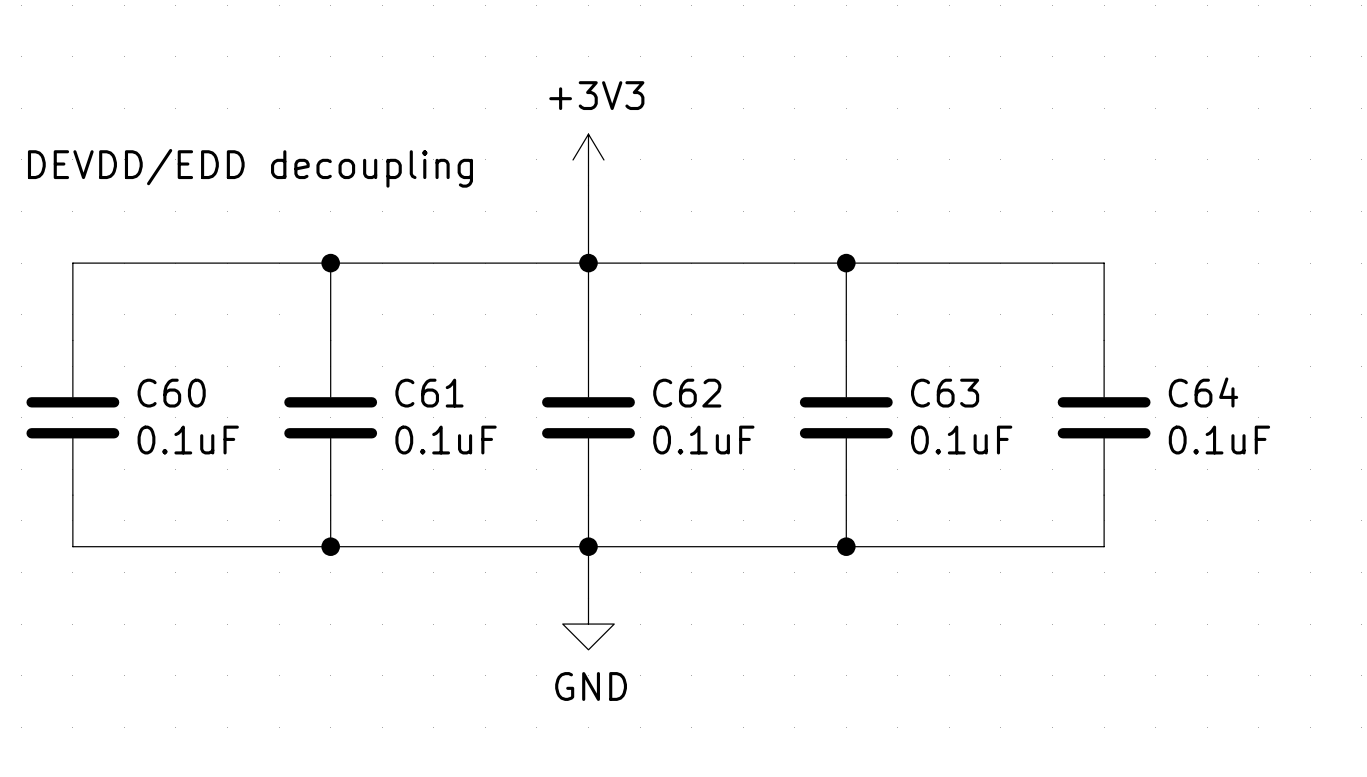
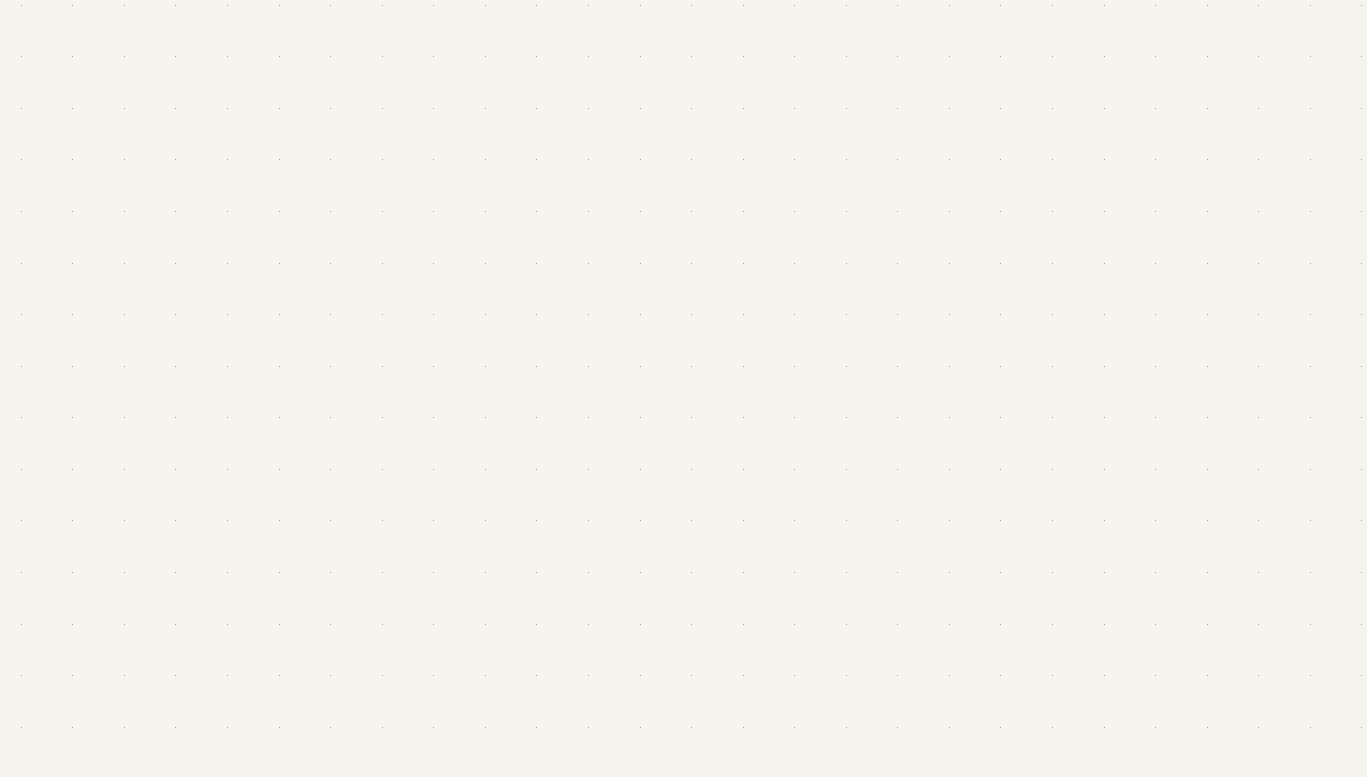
power symbol: +3V3 (588, 159) -> none
text: DEVDD/EDD decoupling (250, 168) -> none
wire: (588, 185) (588, 340) -> none
wire: (330, 263) (330, 340) -> none
junction: (330, 263) -> none
junction: (588, 263) -> none
wire: (846, 263) (846, 340) -> none
junction: (846, 263) -> none
wire: (72, 340) (72, 263) (1104, 263) (1104, 340) -> none
C60: 0.1uF (72, 417) -> none
C61: 0.1uF (330, 417) -> none
C62: 0.1uF (588, 417) -> none
C63: 0.1uF (846, 417) -> none
C64: 0.1uF (1104, 417) -> none
wire: (72, 495) (72, 546) (1104, 546) (1104, 495) -> none
wire: (330, 495) (330, 546) -> none
wire: (588, 495) (588, 598) -> none
wire: (846, 495) (846, 546) -> none
junction: (330, 546) -> none
junction: (588, 546) -> none
junction: (846, 546) -> none
power symbol: GND (588, 624) -> none

